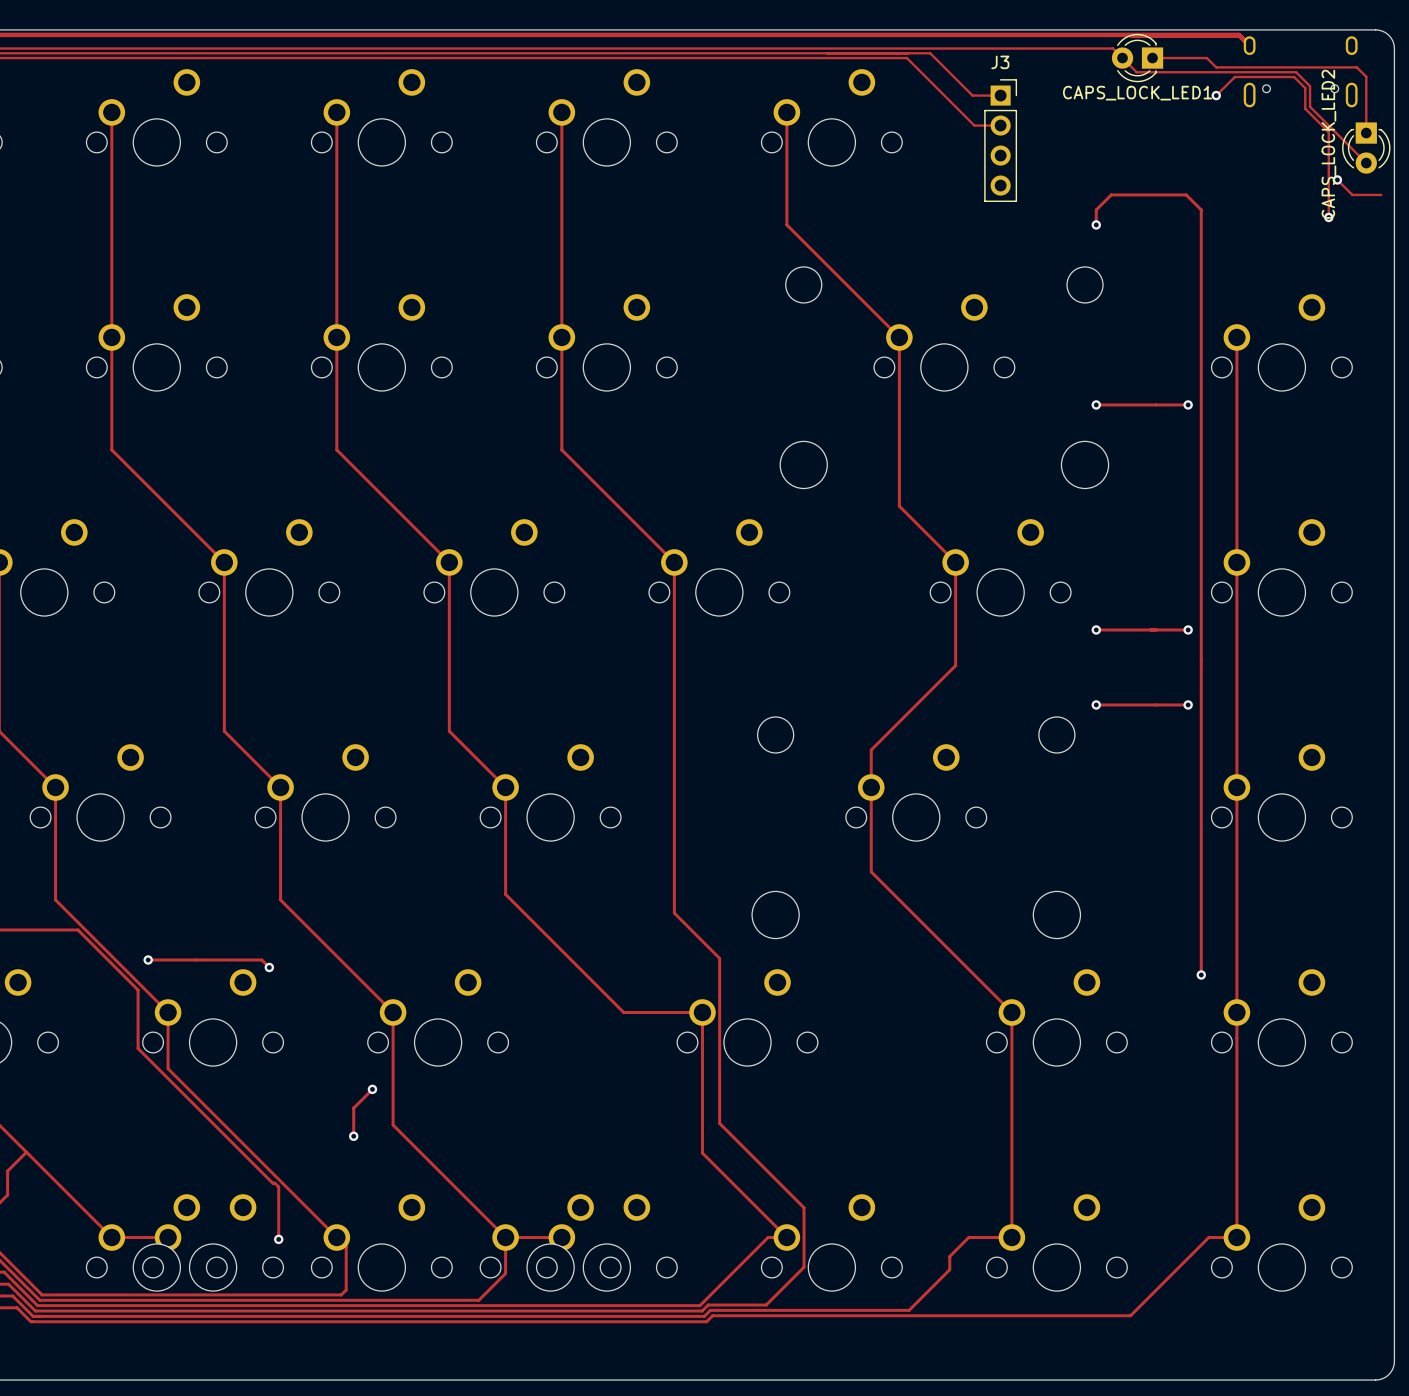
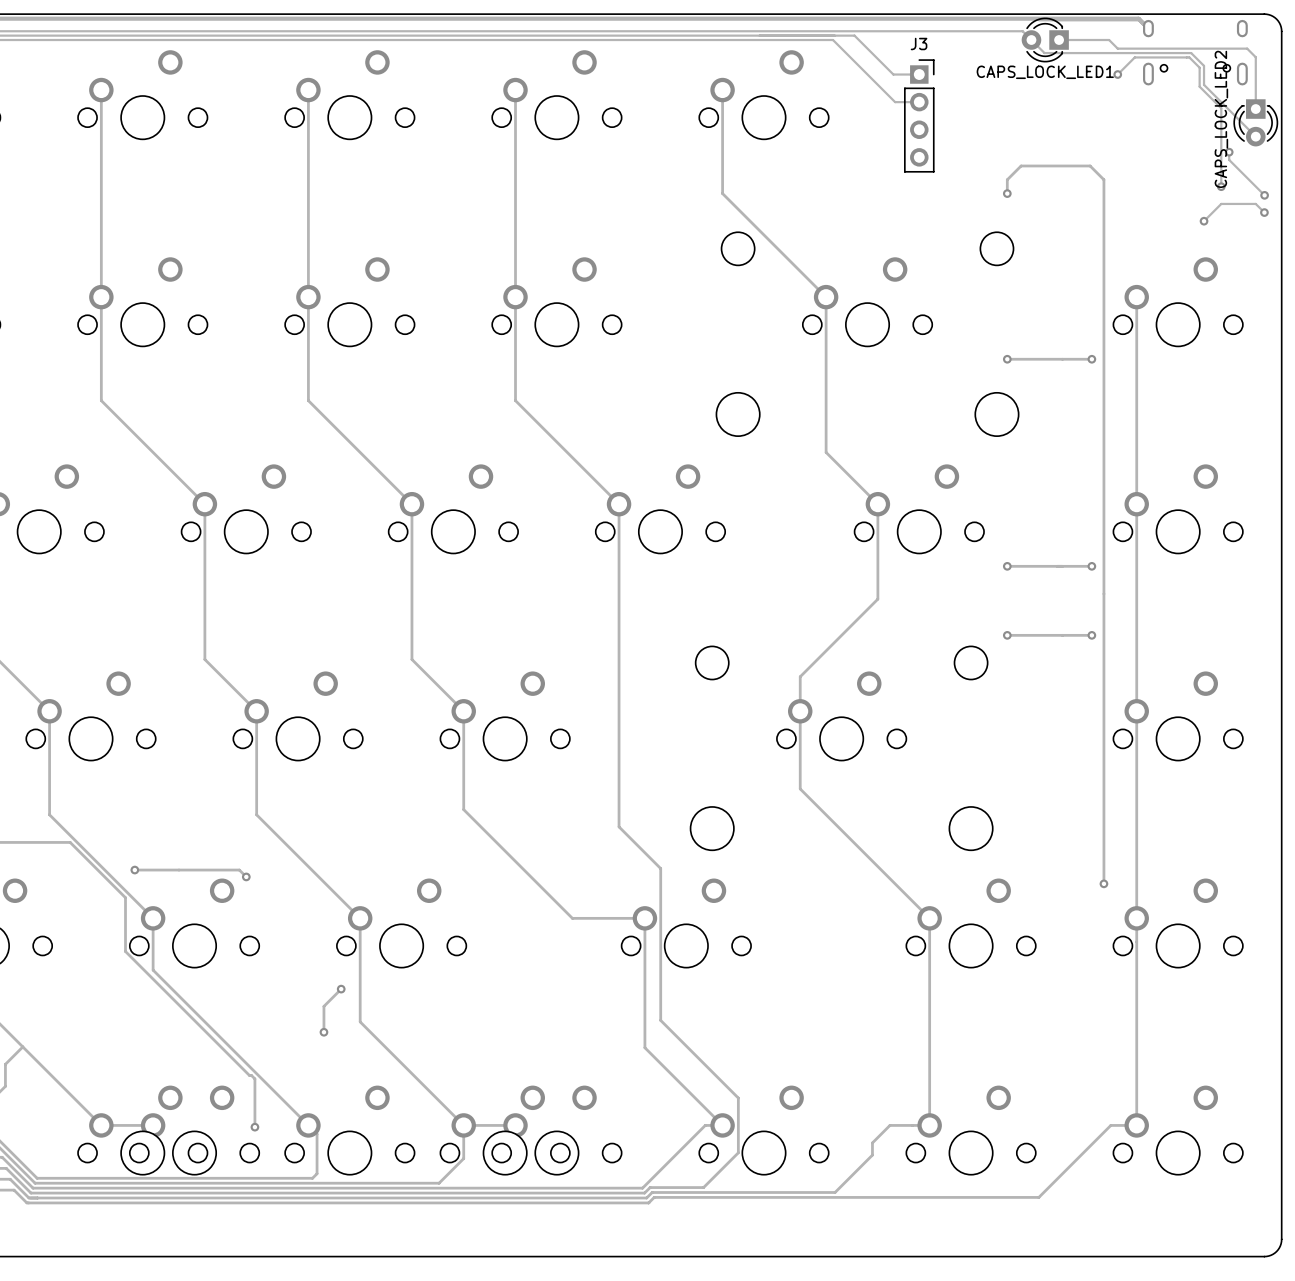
track: (1337, 179) (1352, 194) (1381, 194) -> none
track: none -> (1229, 152) (1229, 159) (1264, 195)
via: none -> (1264, 195)
track: none -> (1264, 212) (1255, 203) (1221, 203) (1204, 221)
via: none -> (1264, 212)
via: none -> (1204, 221)

